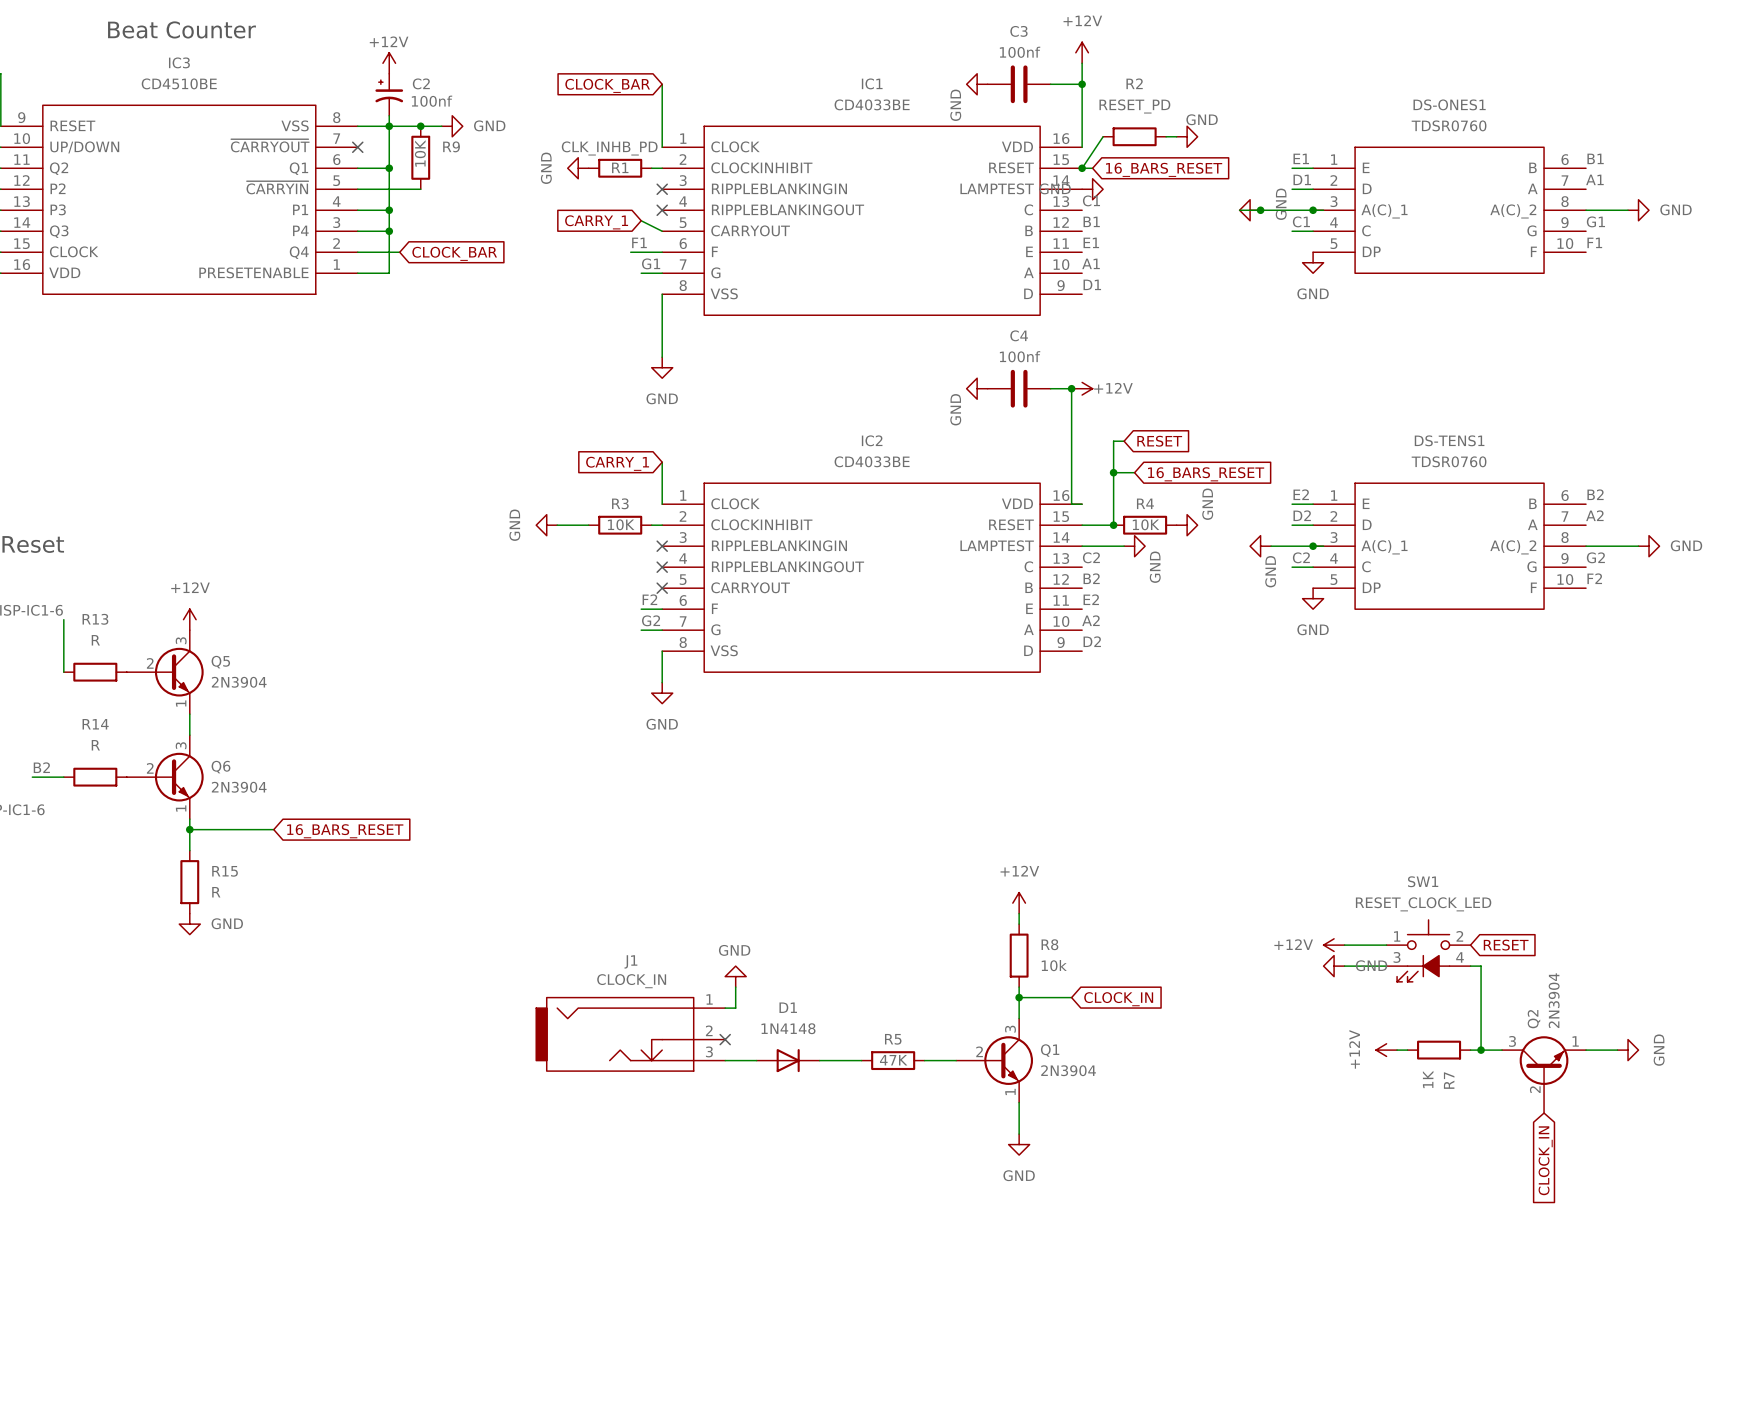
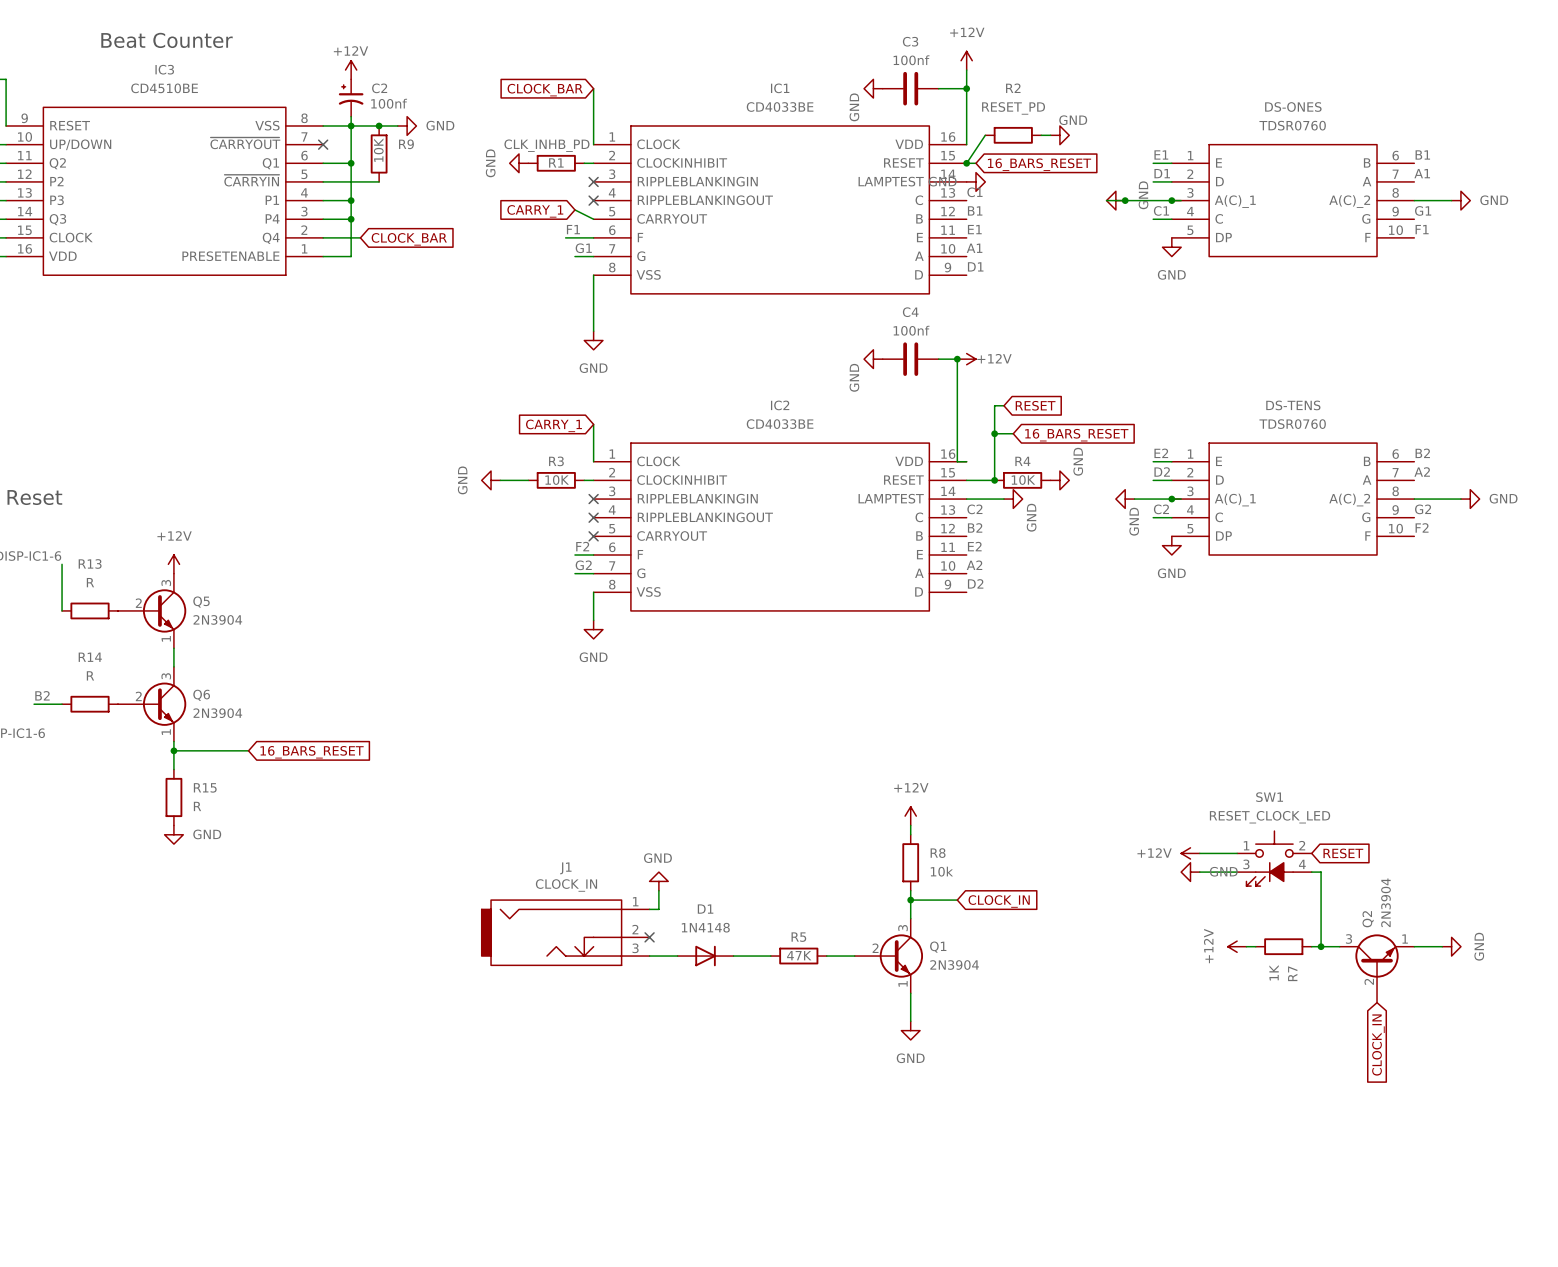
DS-ONES1 name: DS-ONES1 (1449, 104) -> DS-ONES (1293, 107)
DS-TENS1 name: DS-TENS1 (1449, 440) -> DS-TENS (1293, 405)

